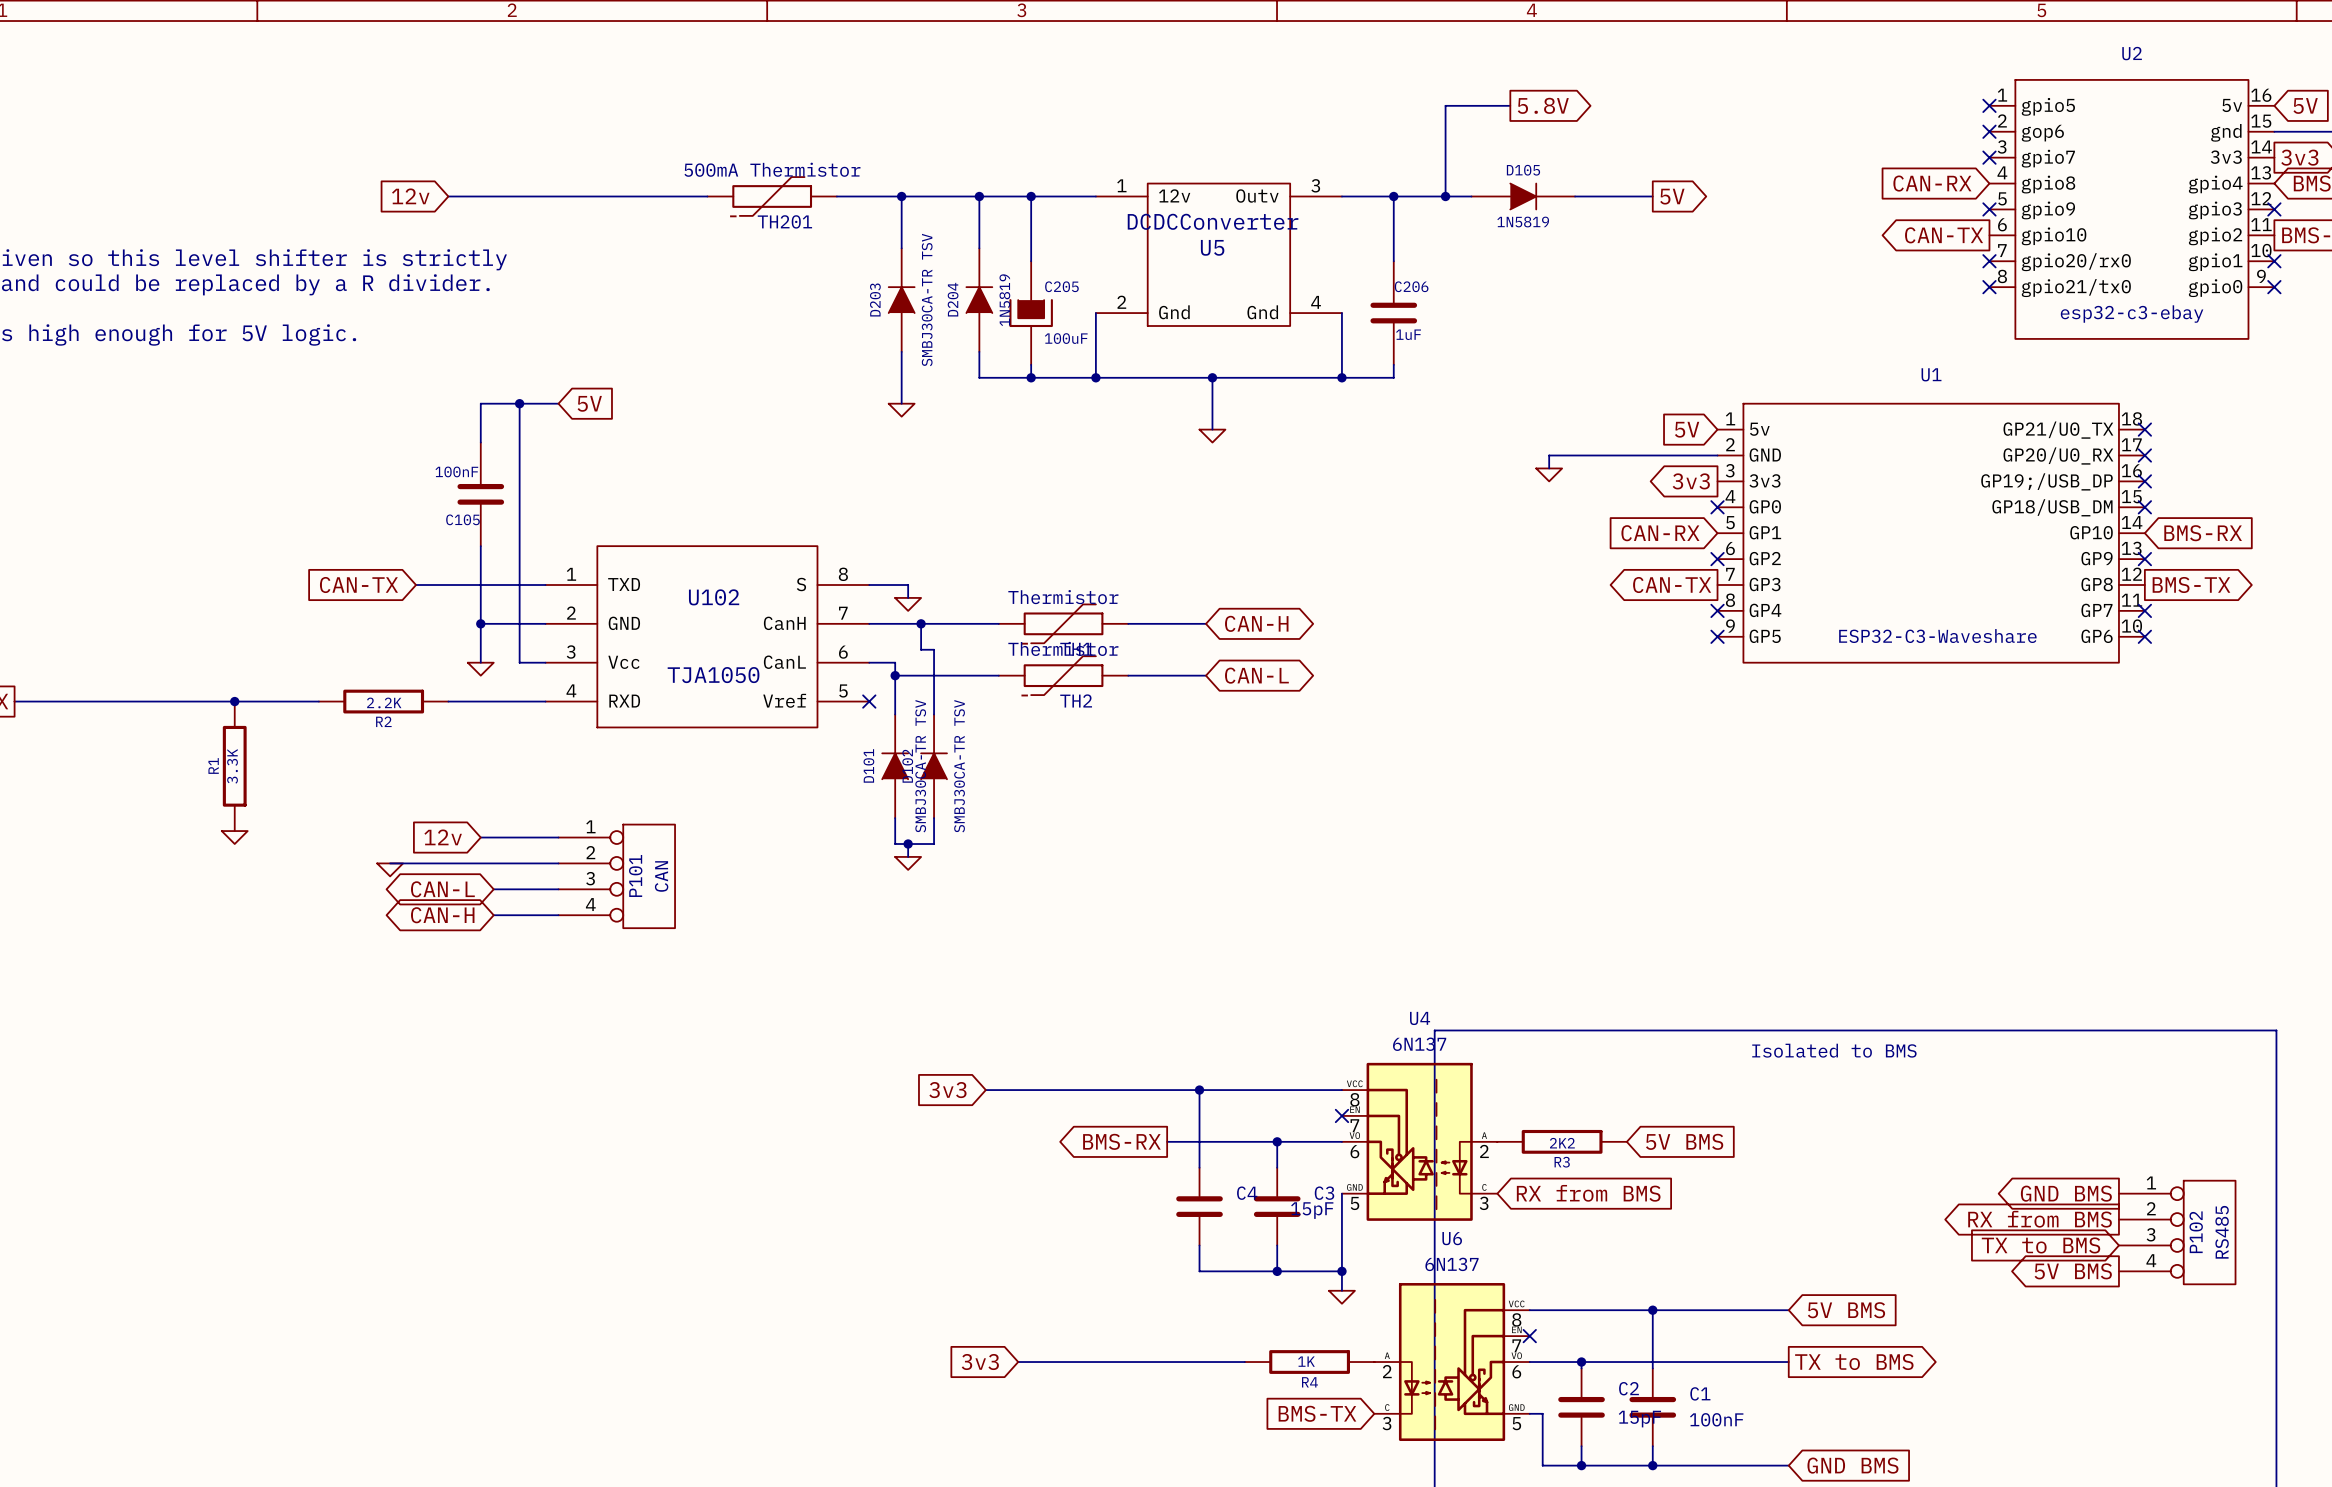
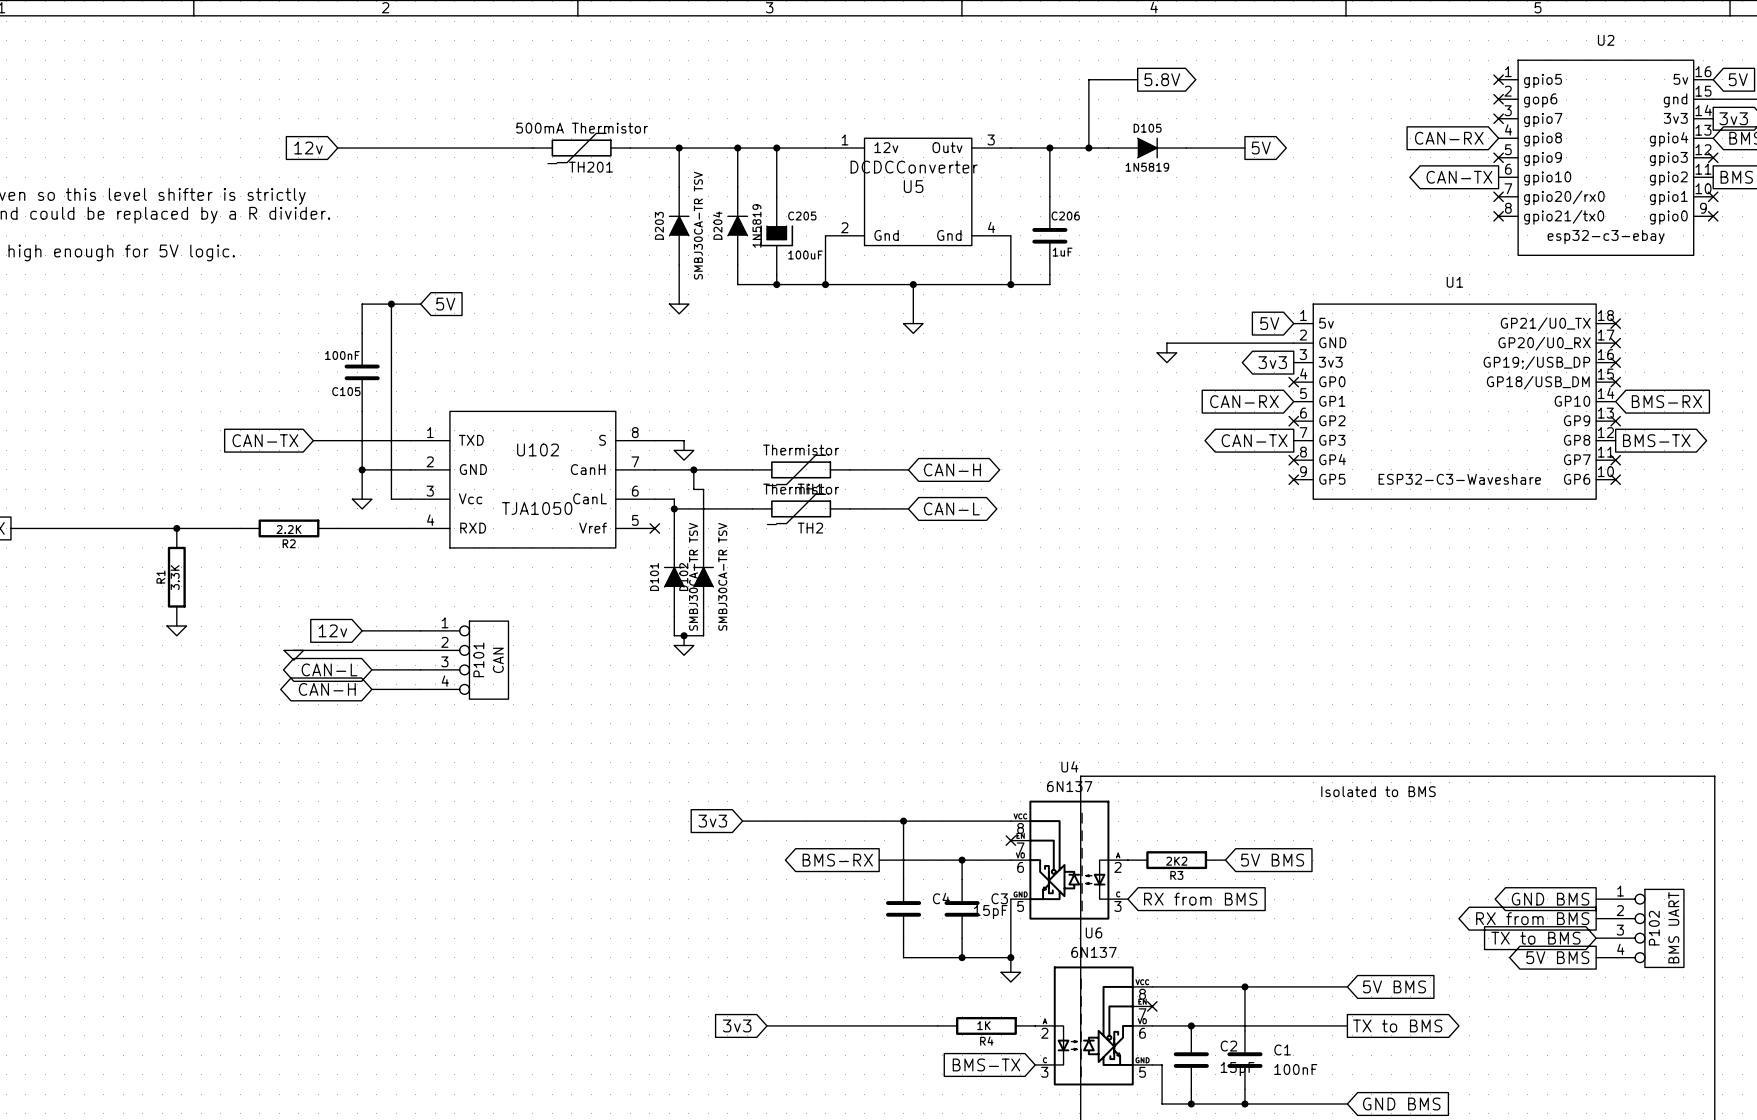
P102 value: RS485 (2222, 1232) -> BMS UART (1673, 927)

